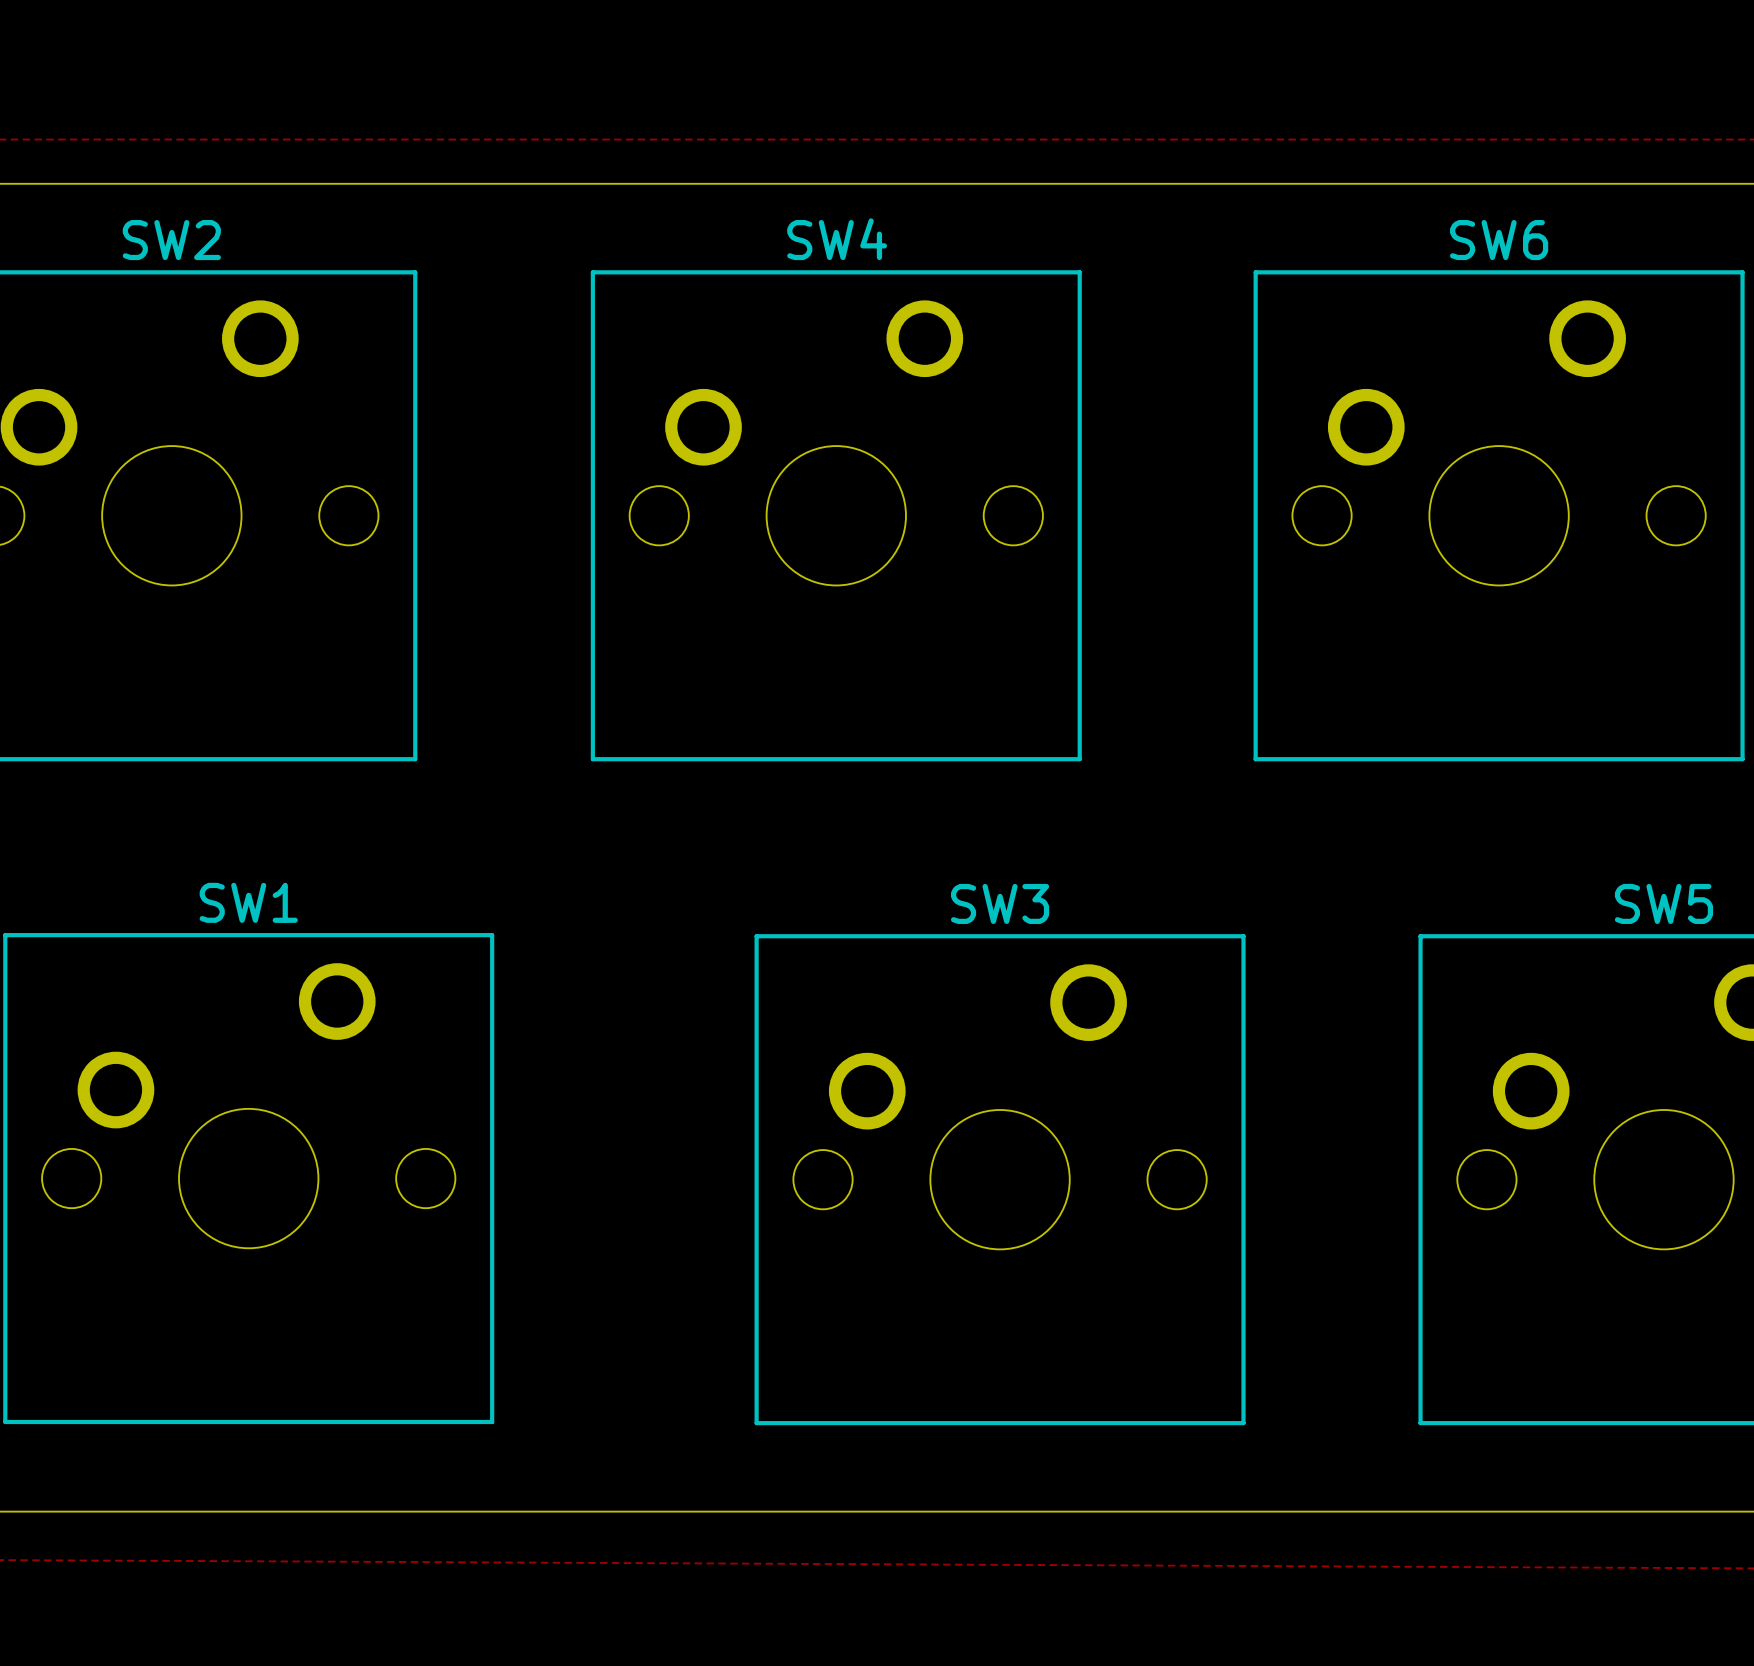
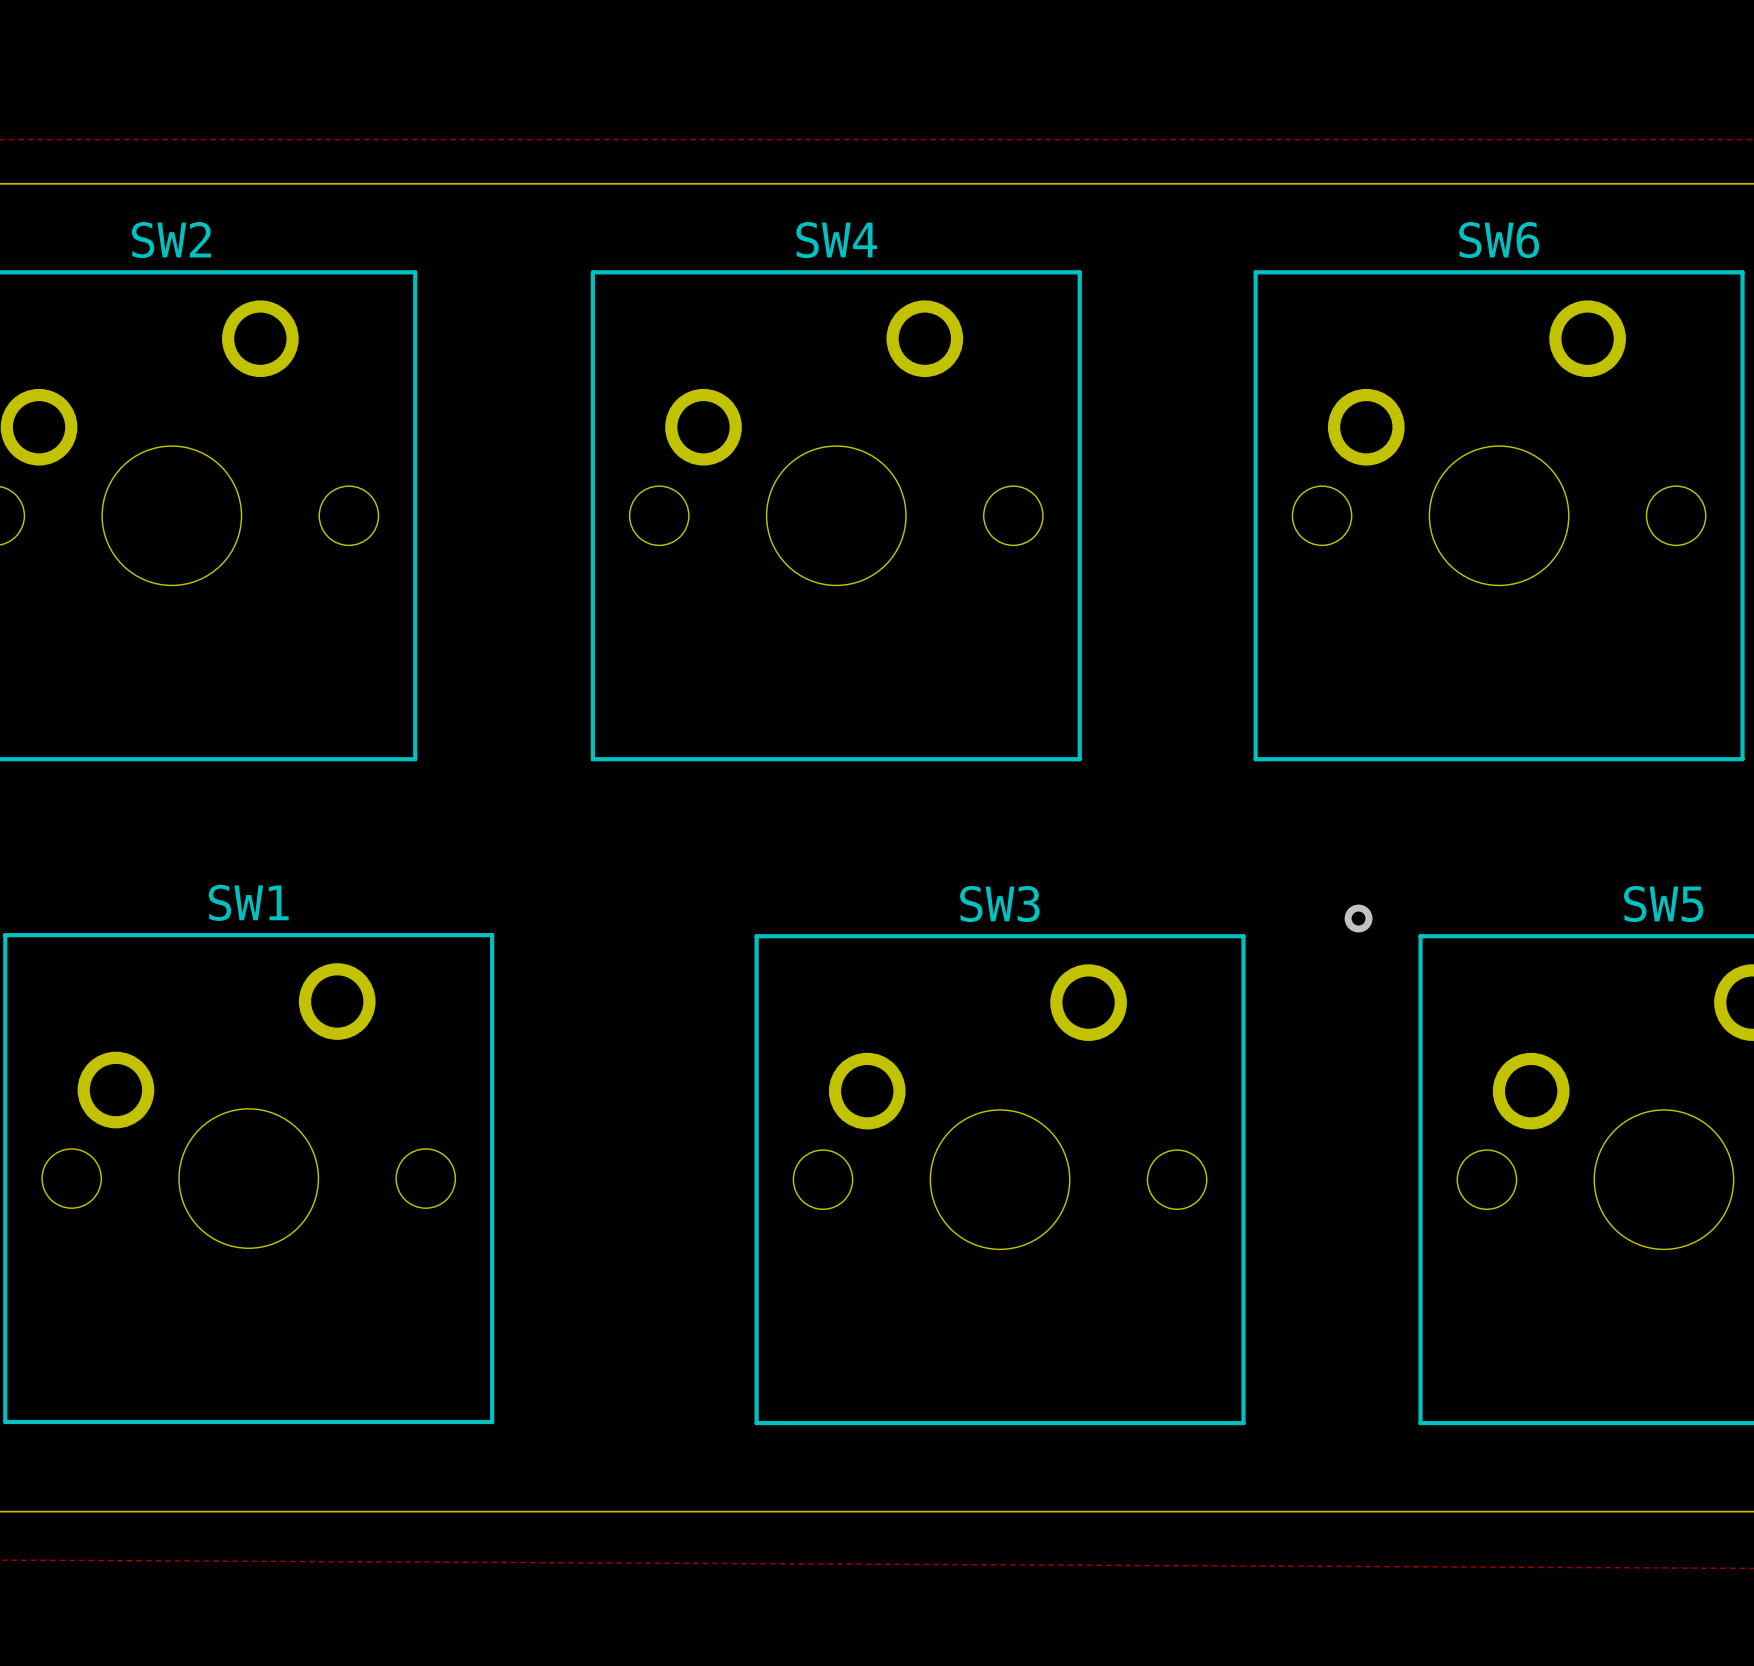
via: none -> (1358, 918)

